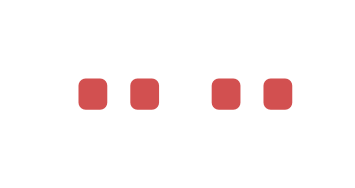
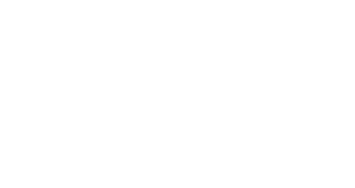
part: (118, 94) -> none
part: (251, 94) -> none

